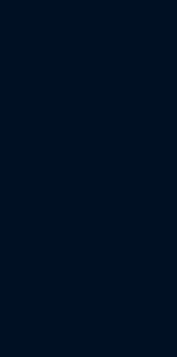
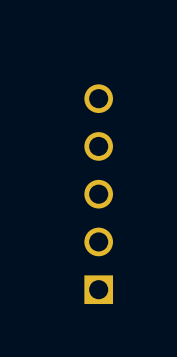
part: none -> (98, 194)

